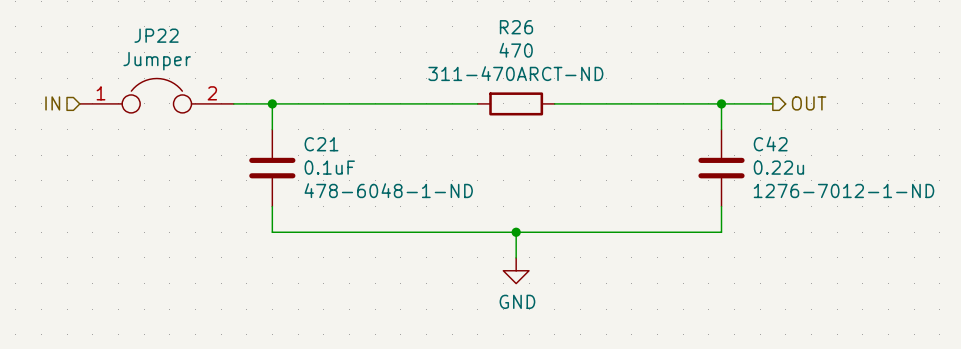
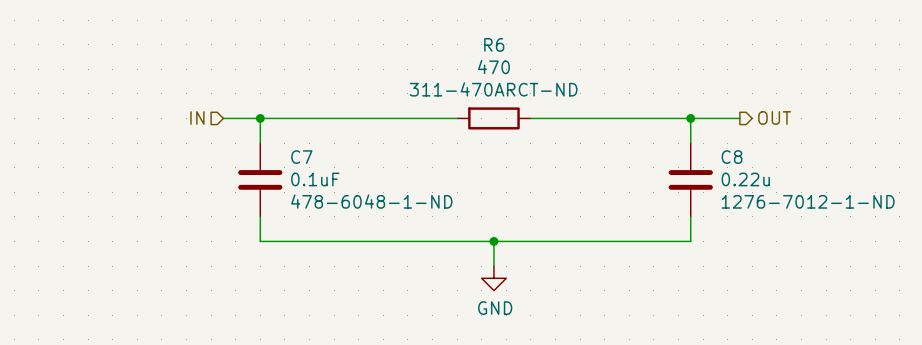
R26 name: R26 (516, 27) -> R6 (494, 44)
JP22: Jumper (156, 95) -> none
hierarchical label position: IN (52, 103) -> IN (197, 117)
C42 name: C42 (770, 143) -> C8 (731, 157)
C21 name: C21 (321, 144) -> C7 (301, 157)

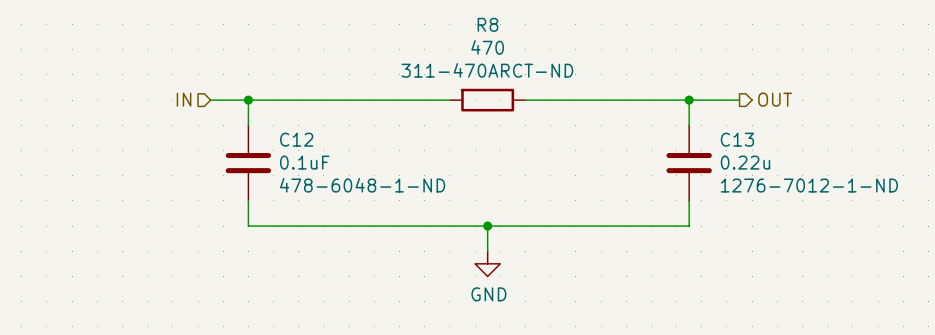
R6 name: R6 (494, 44) -> R8 (487, 24)
C7 name: C7 (301, 157) -> C12 (296, 139)
C8 name: C8 (731, 157) -> C13 (737, 139)

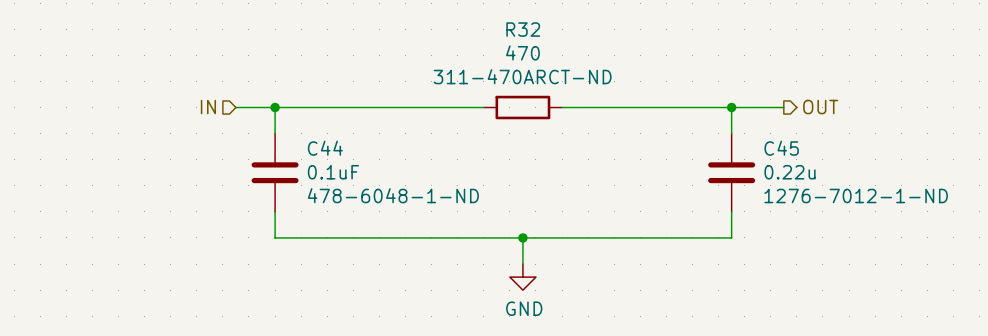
R8 name: R8 (487, 24) -> R32 (523, 29)
C12 name: C12 (296, 139) -> C44 (325, 148)
C13 name: C13 (737, 139) -> C45 (781, 148)

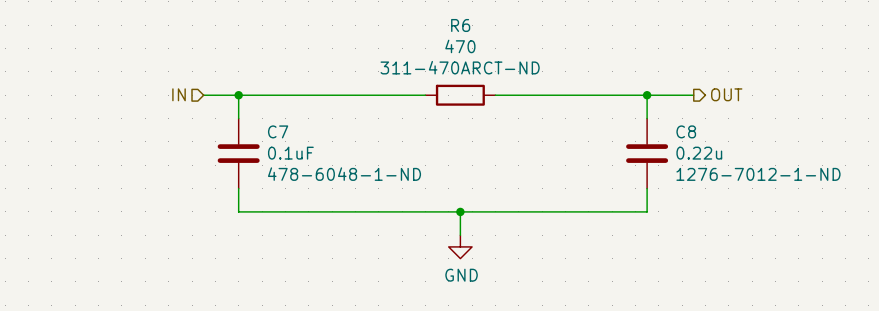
R32 name: R32 (523, 29) -> R6 (460, 25)
C44 name: C44 (325, 148) -> C7 (278, 131)
C45 name: C45 (781, 148) -> C8 (686, 131)

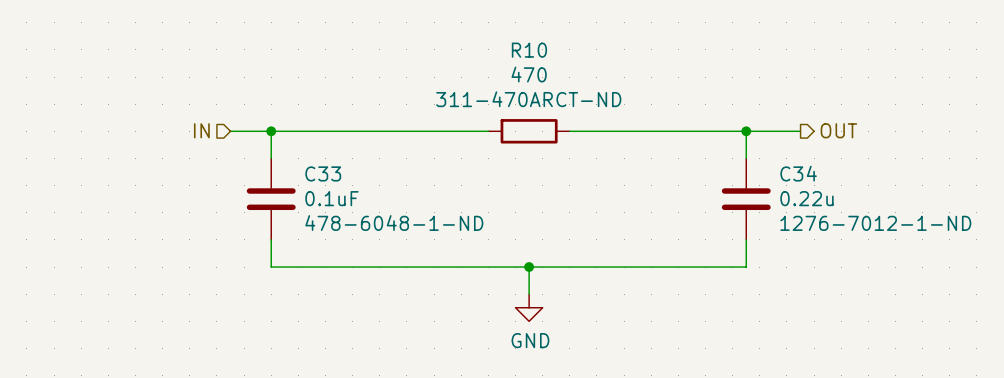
R6 name: R6 (460, 25) -> R10 (529, 50)
C7 name: C7 (278, 131) -> C33 (323, 173)
C8 name: C8 (686, 131) -> C34 (798, 173)

